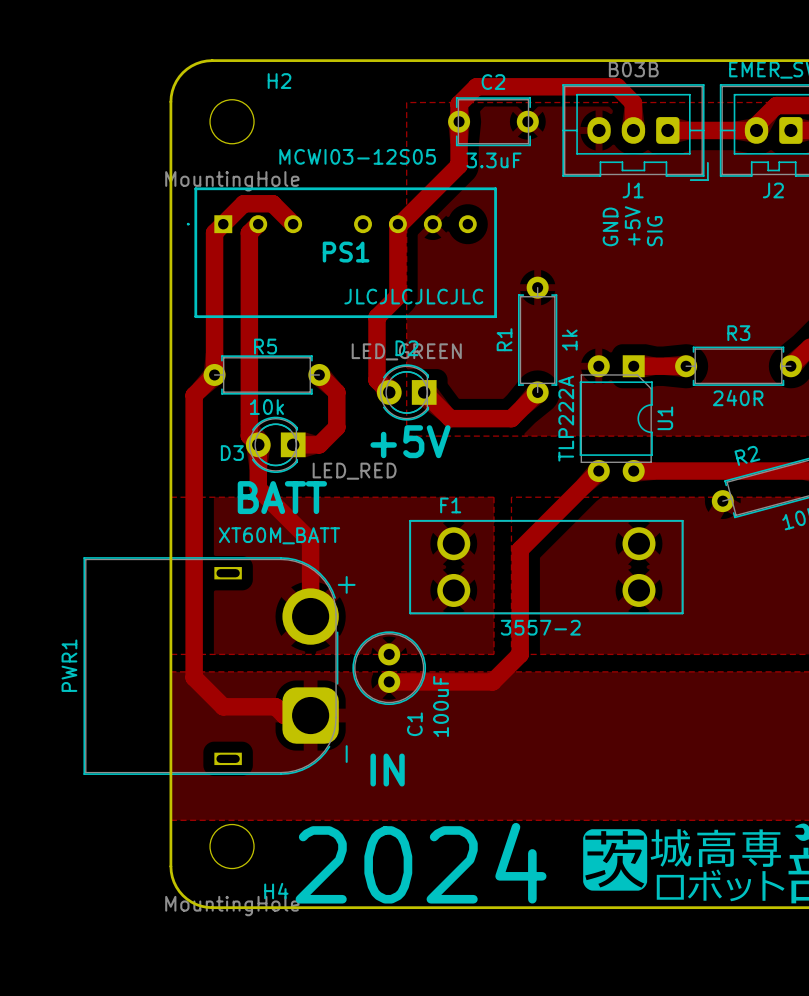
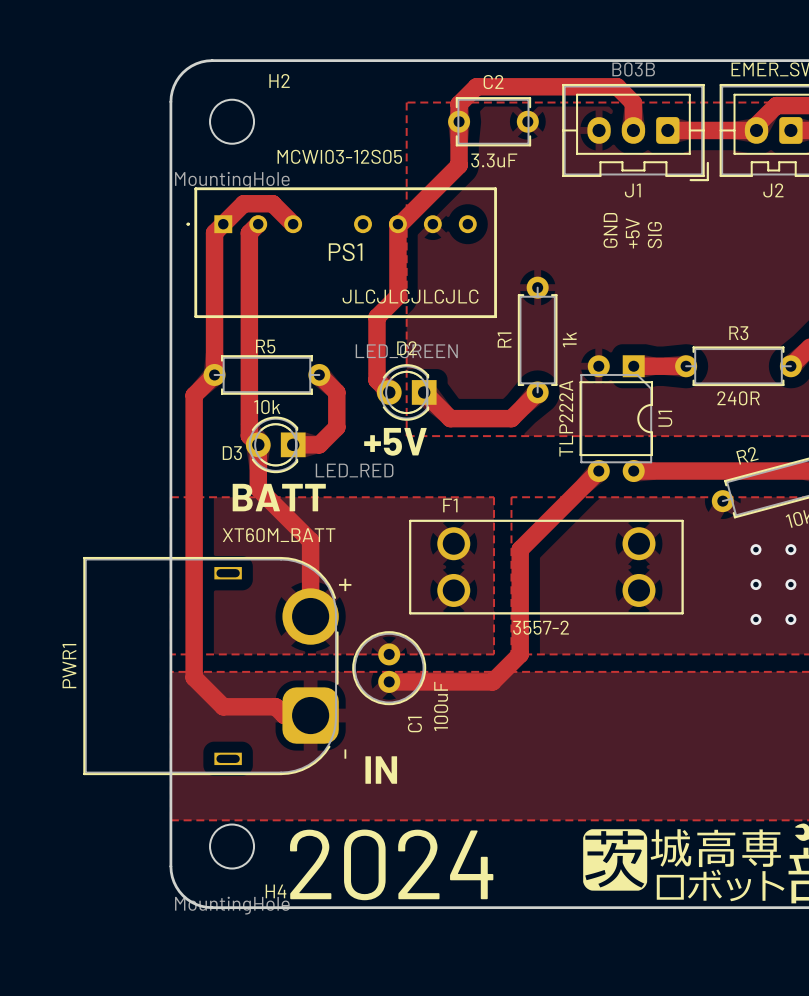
via: none -> (755, 549)
via: none -> (790, 549)
via: none -> (755, 584)
via: none -> (790, 584)
via: none -> (755, 619)
via: none -> (790, 619)

